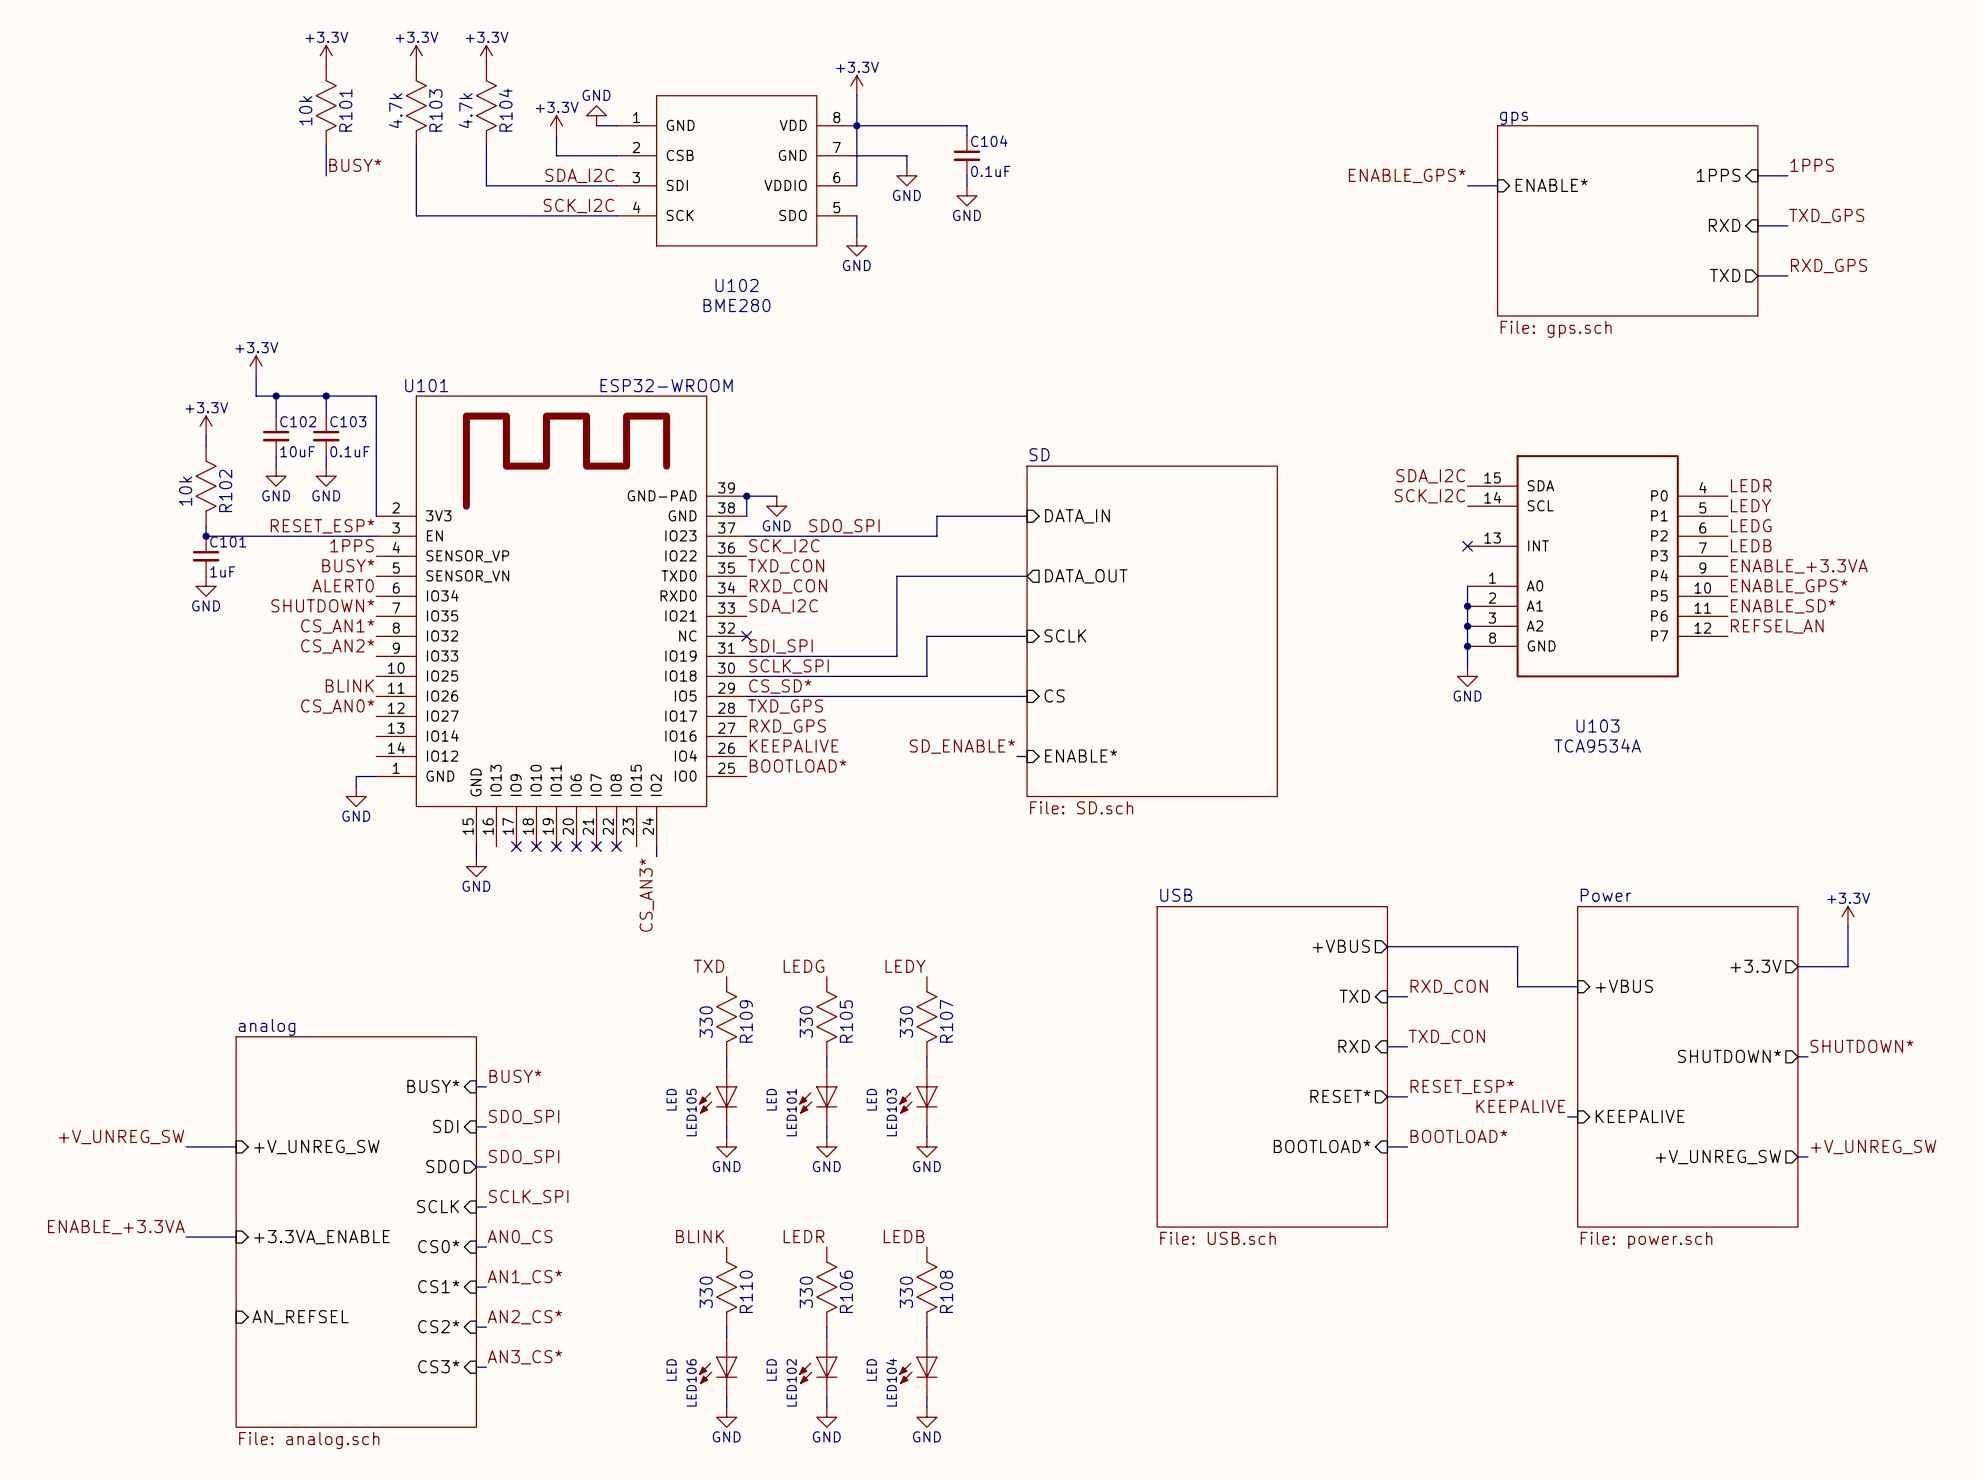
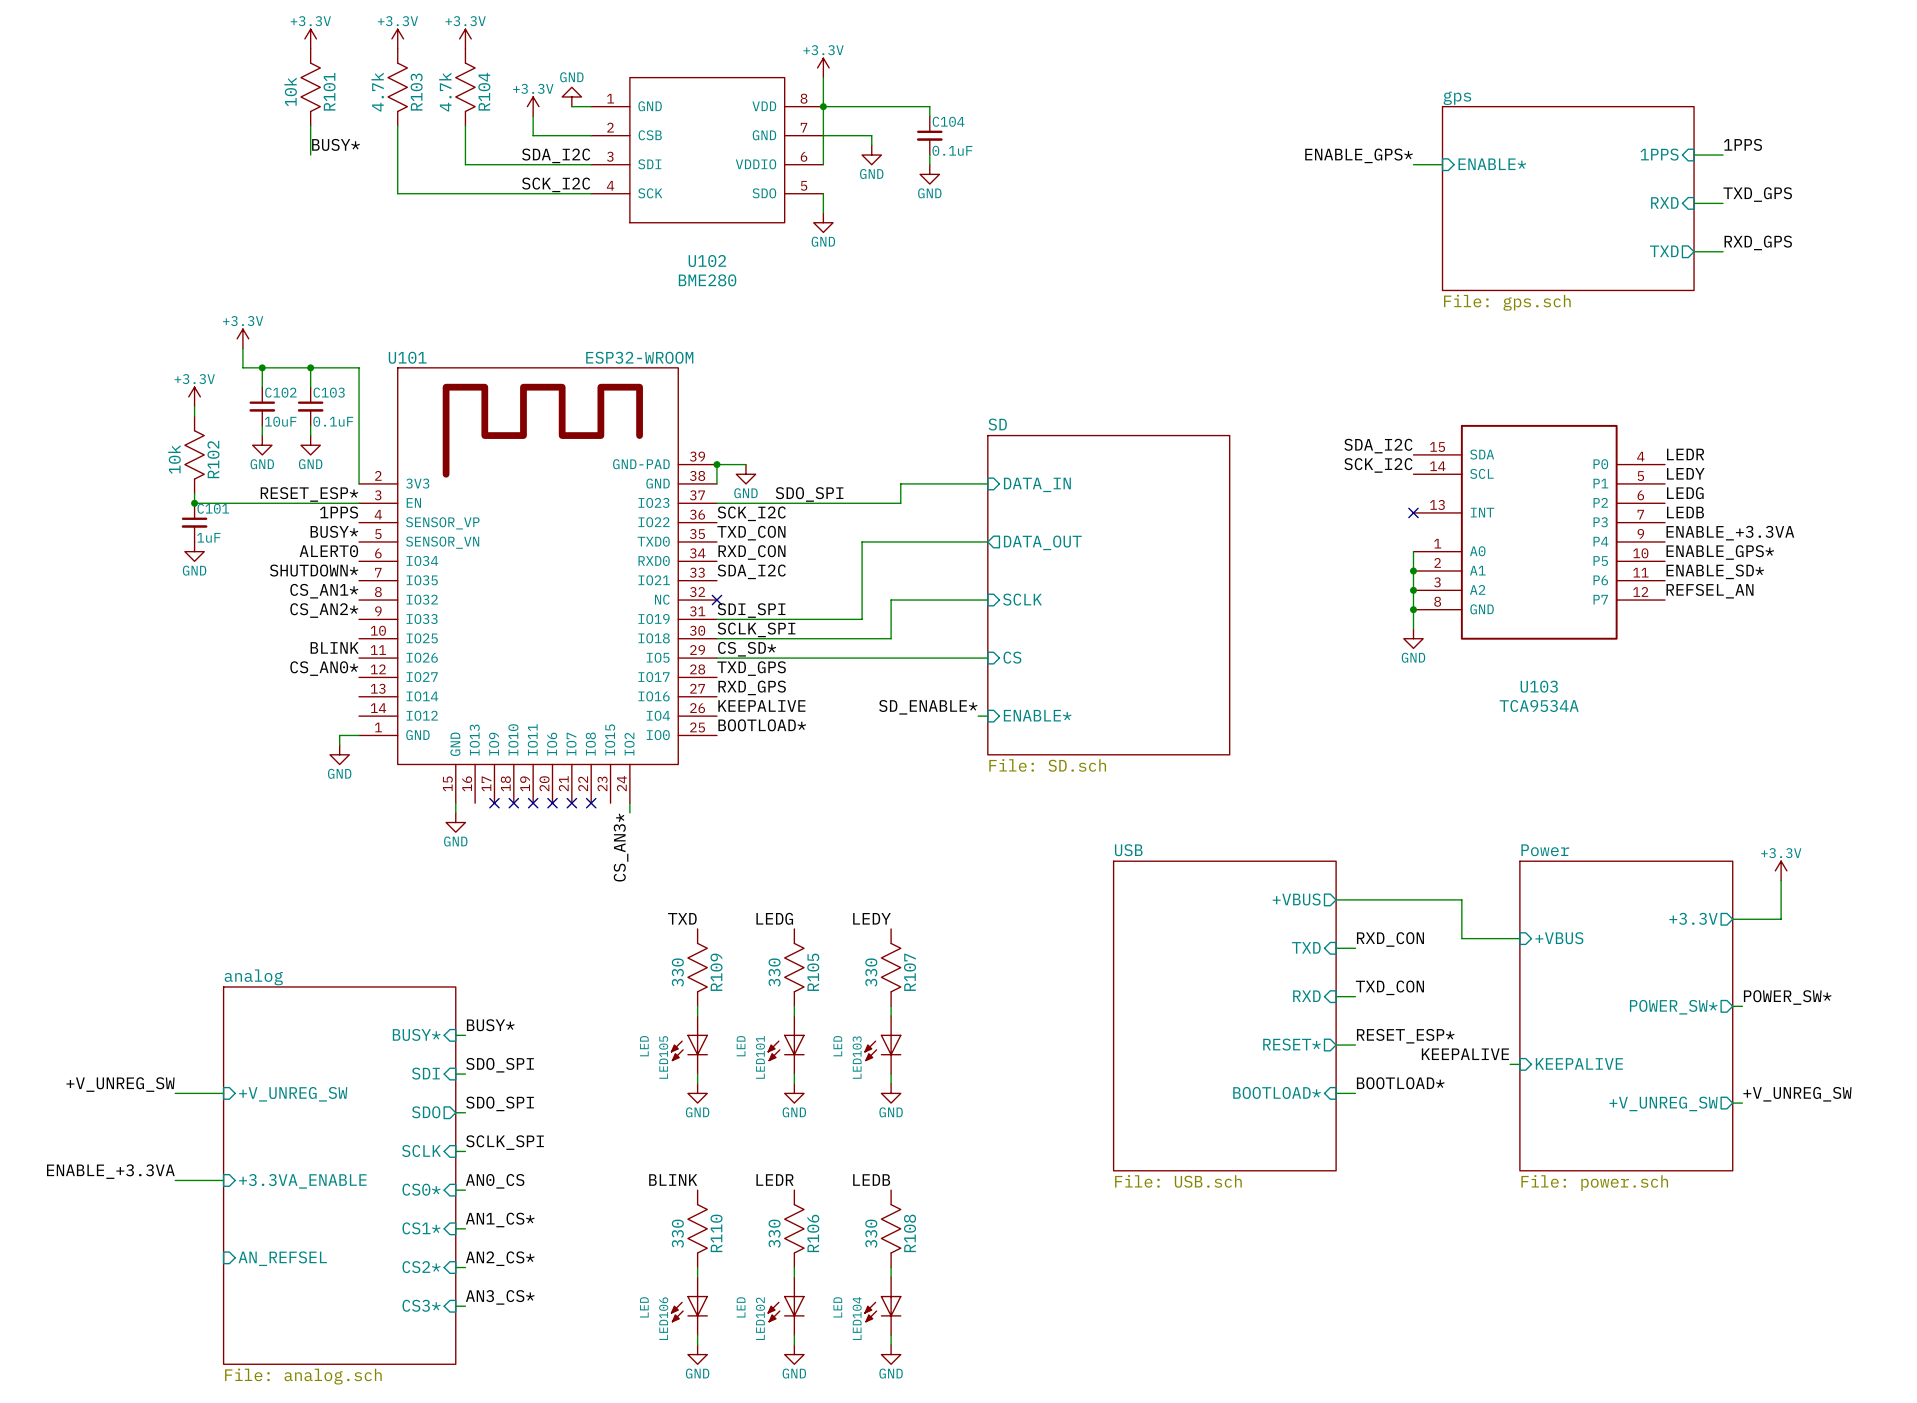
label: SHUTDOWN* (1861, 1046) -> POWER_SW* (1787, 997)
sheet pin: SHUTDOWN* (1729, 1056) -> POWER_SW* (1673, 1007)

